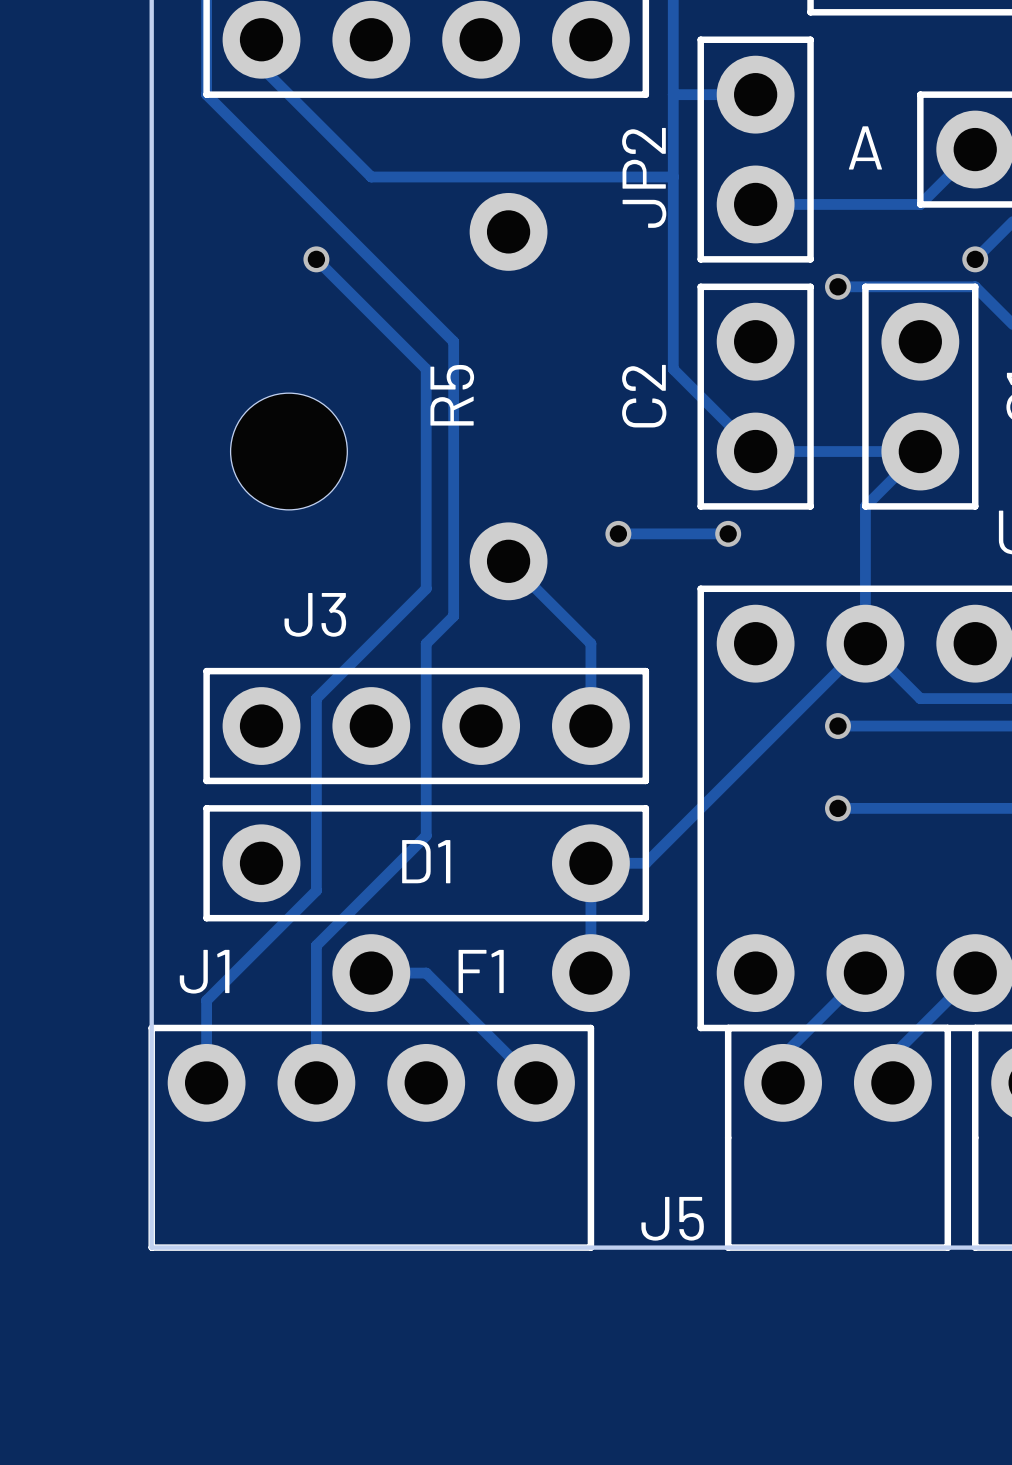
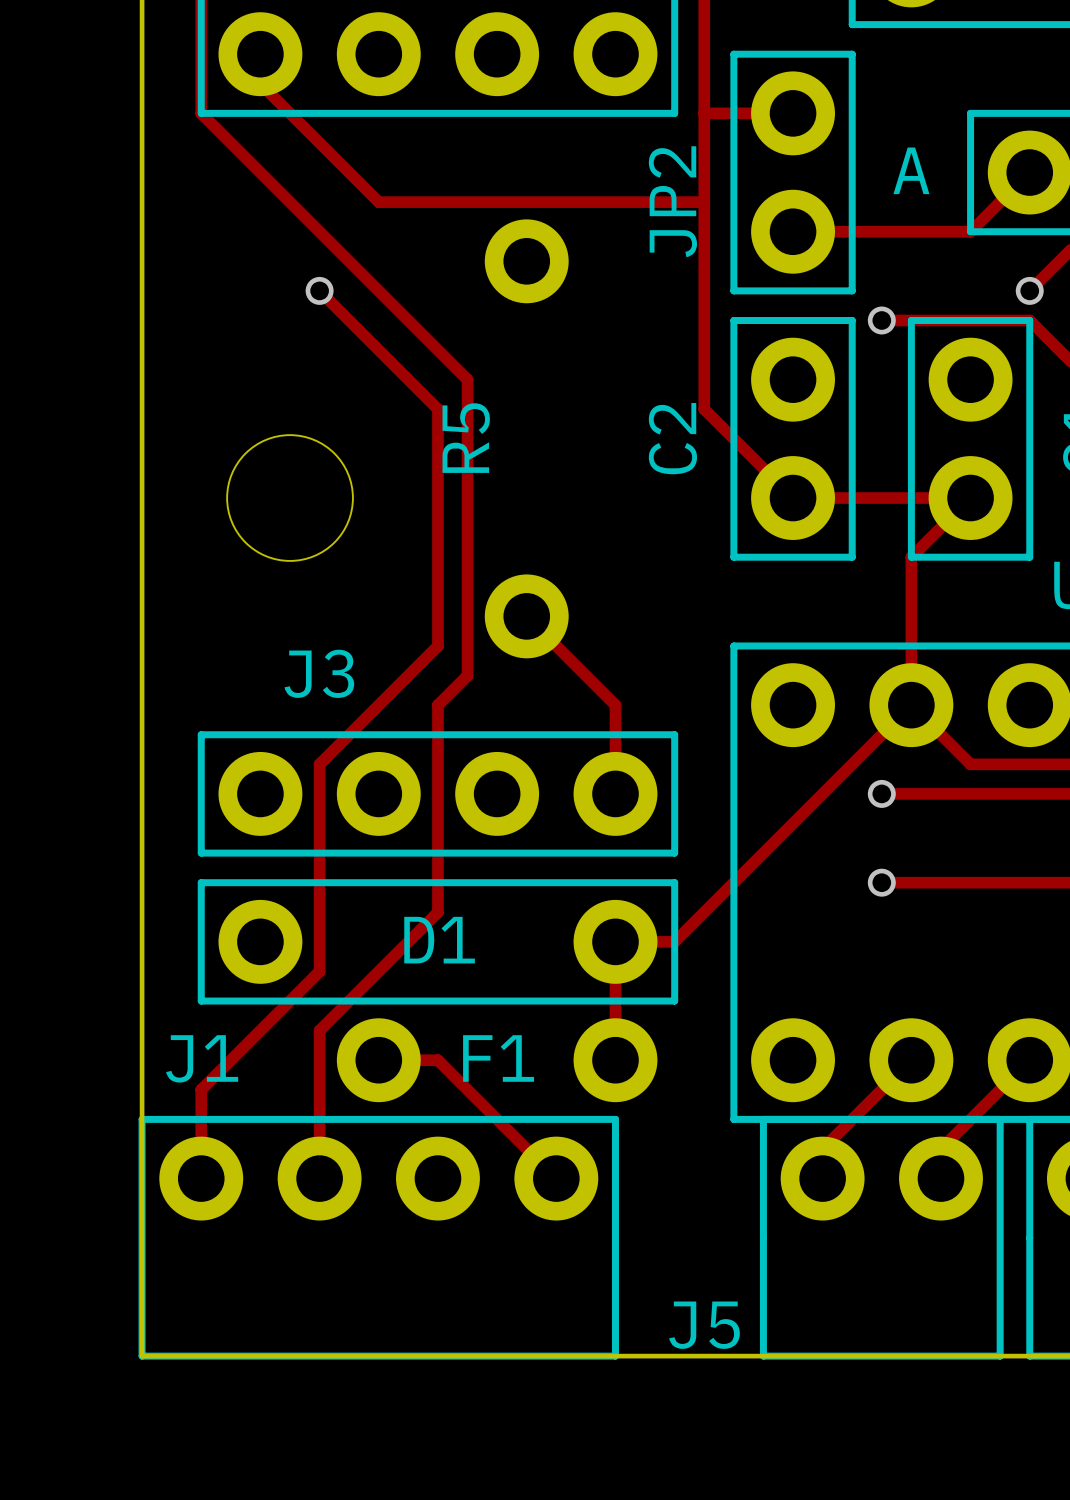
track: (618, 533) (728, 533) -> none
via: (618, 533) -> none
via: (728, 533) -> none

